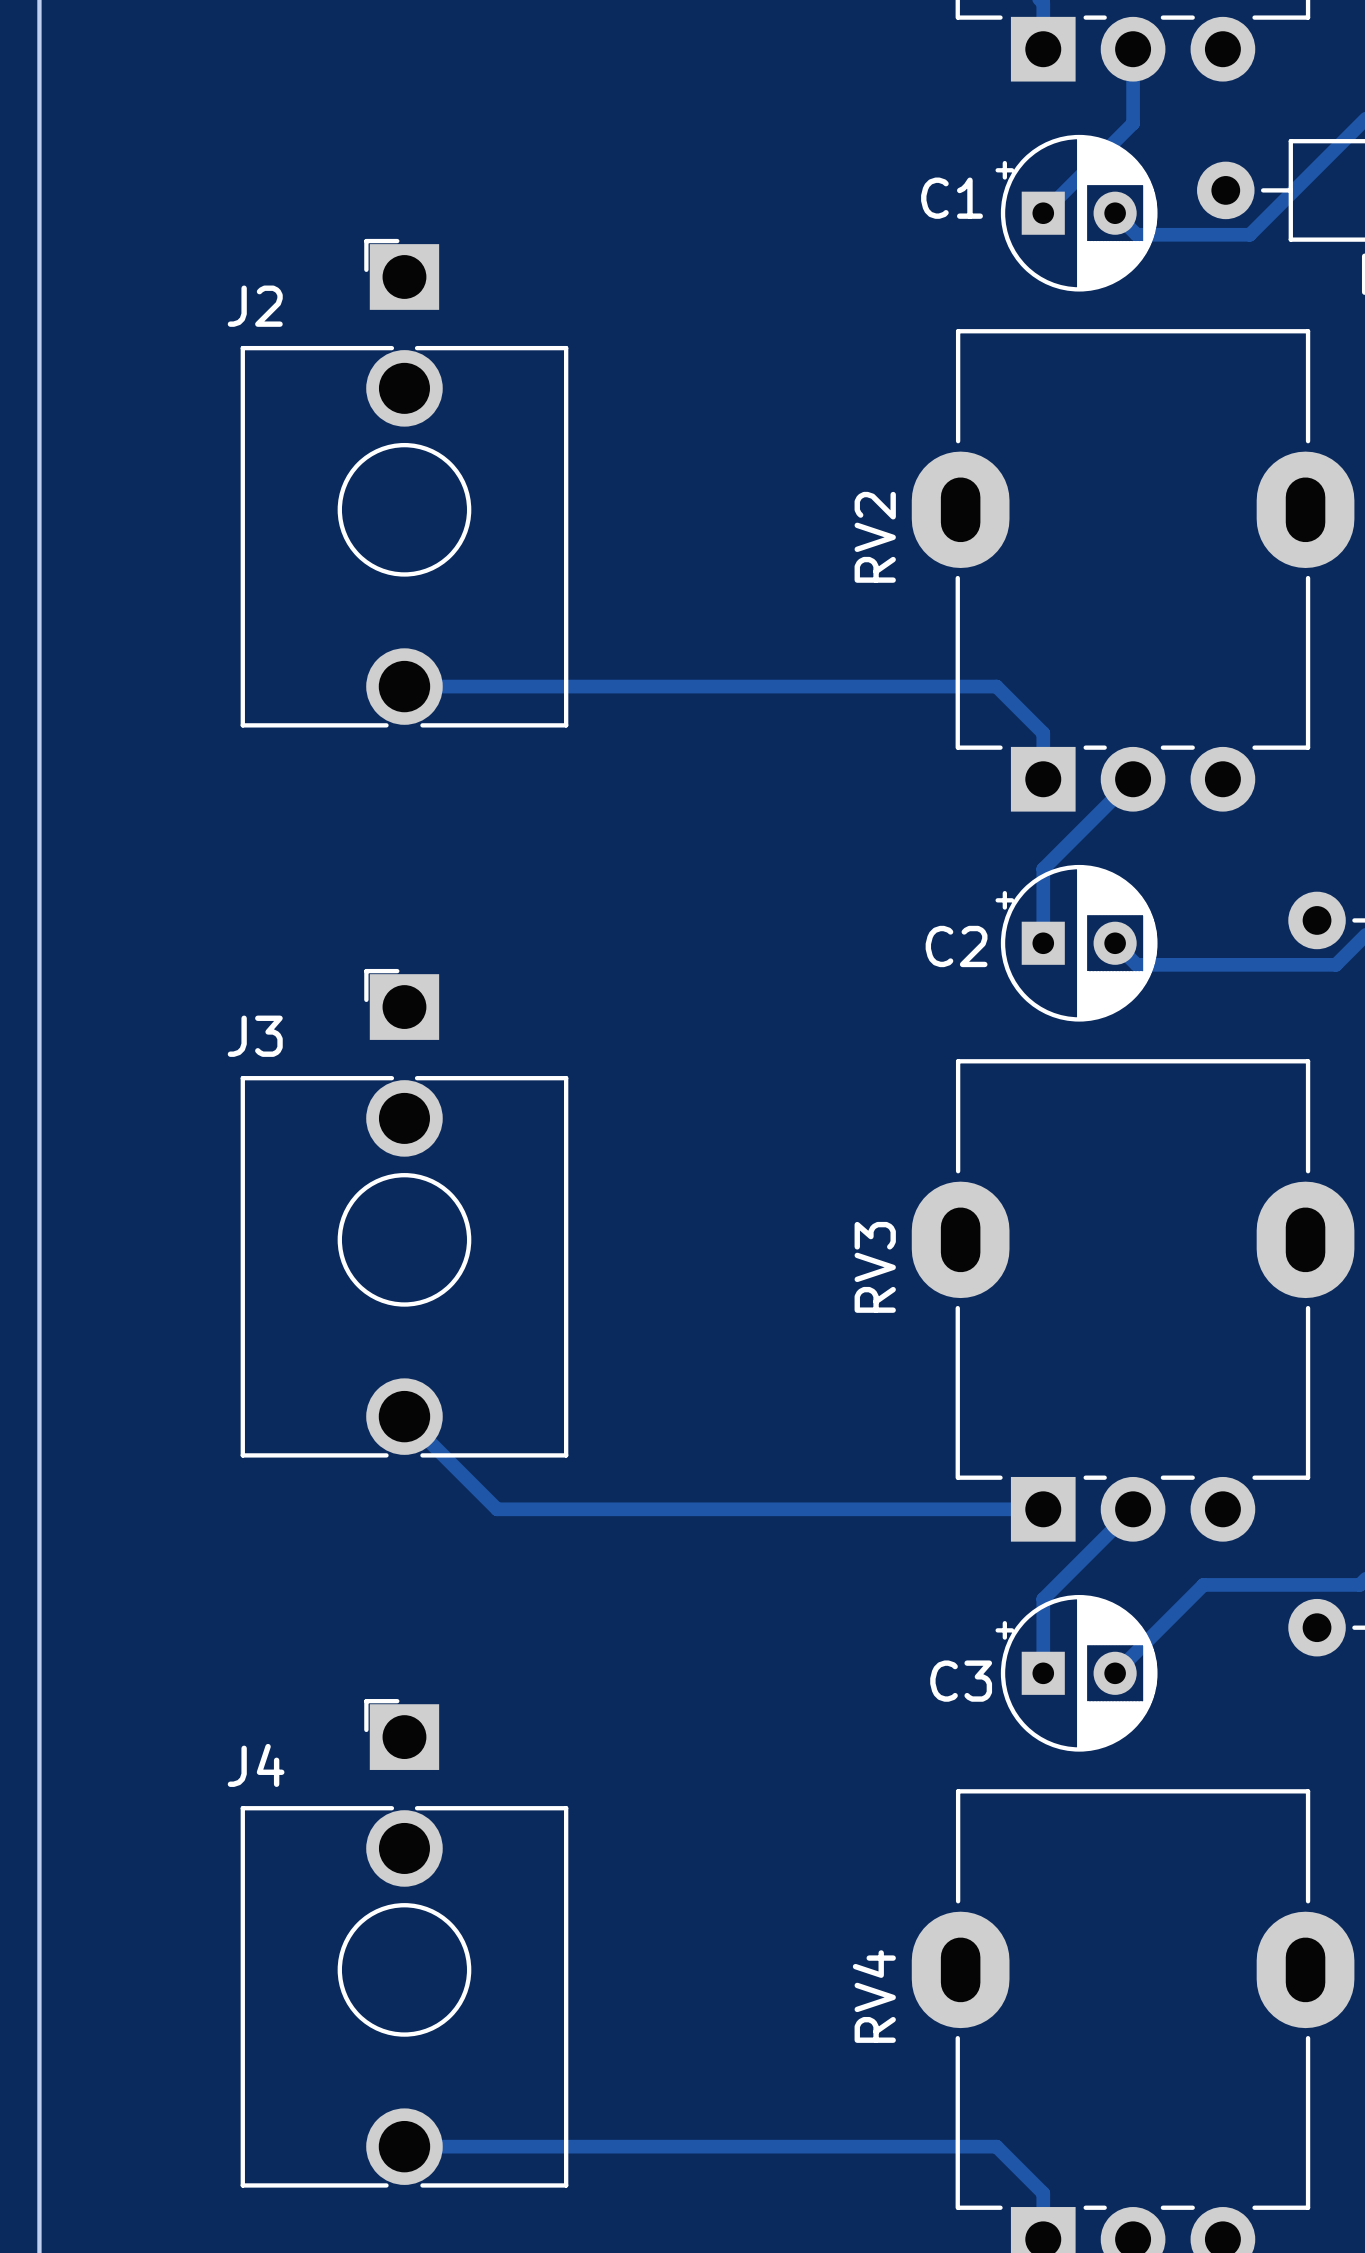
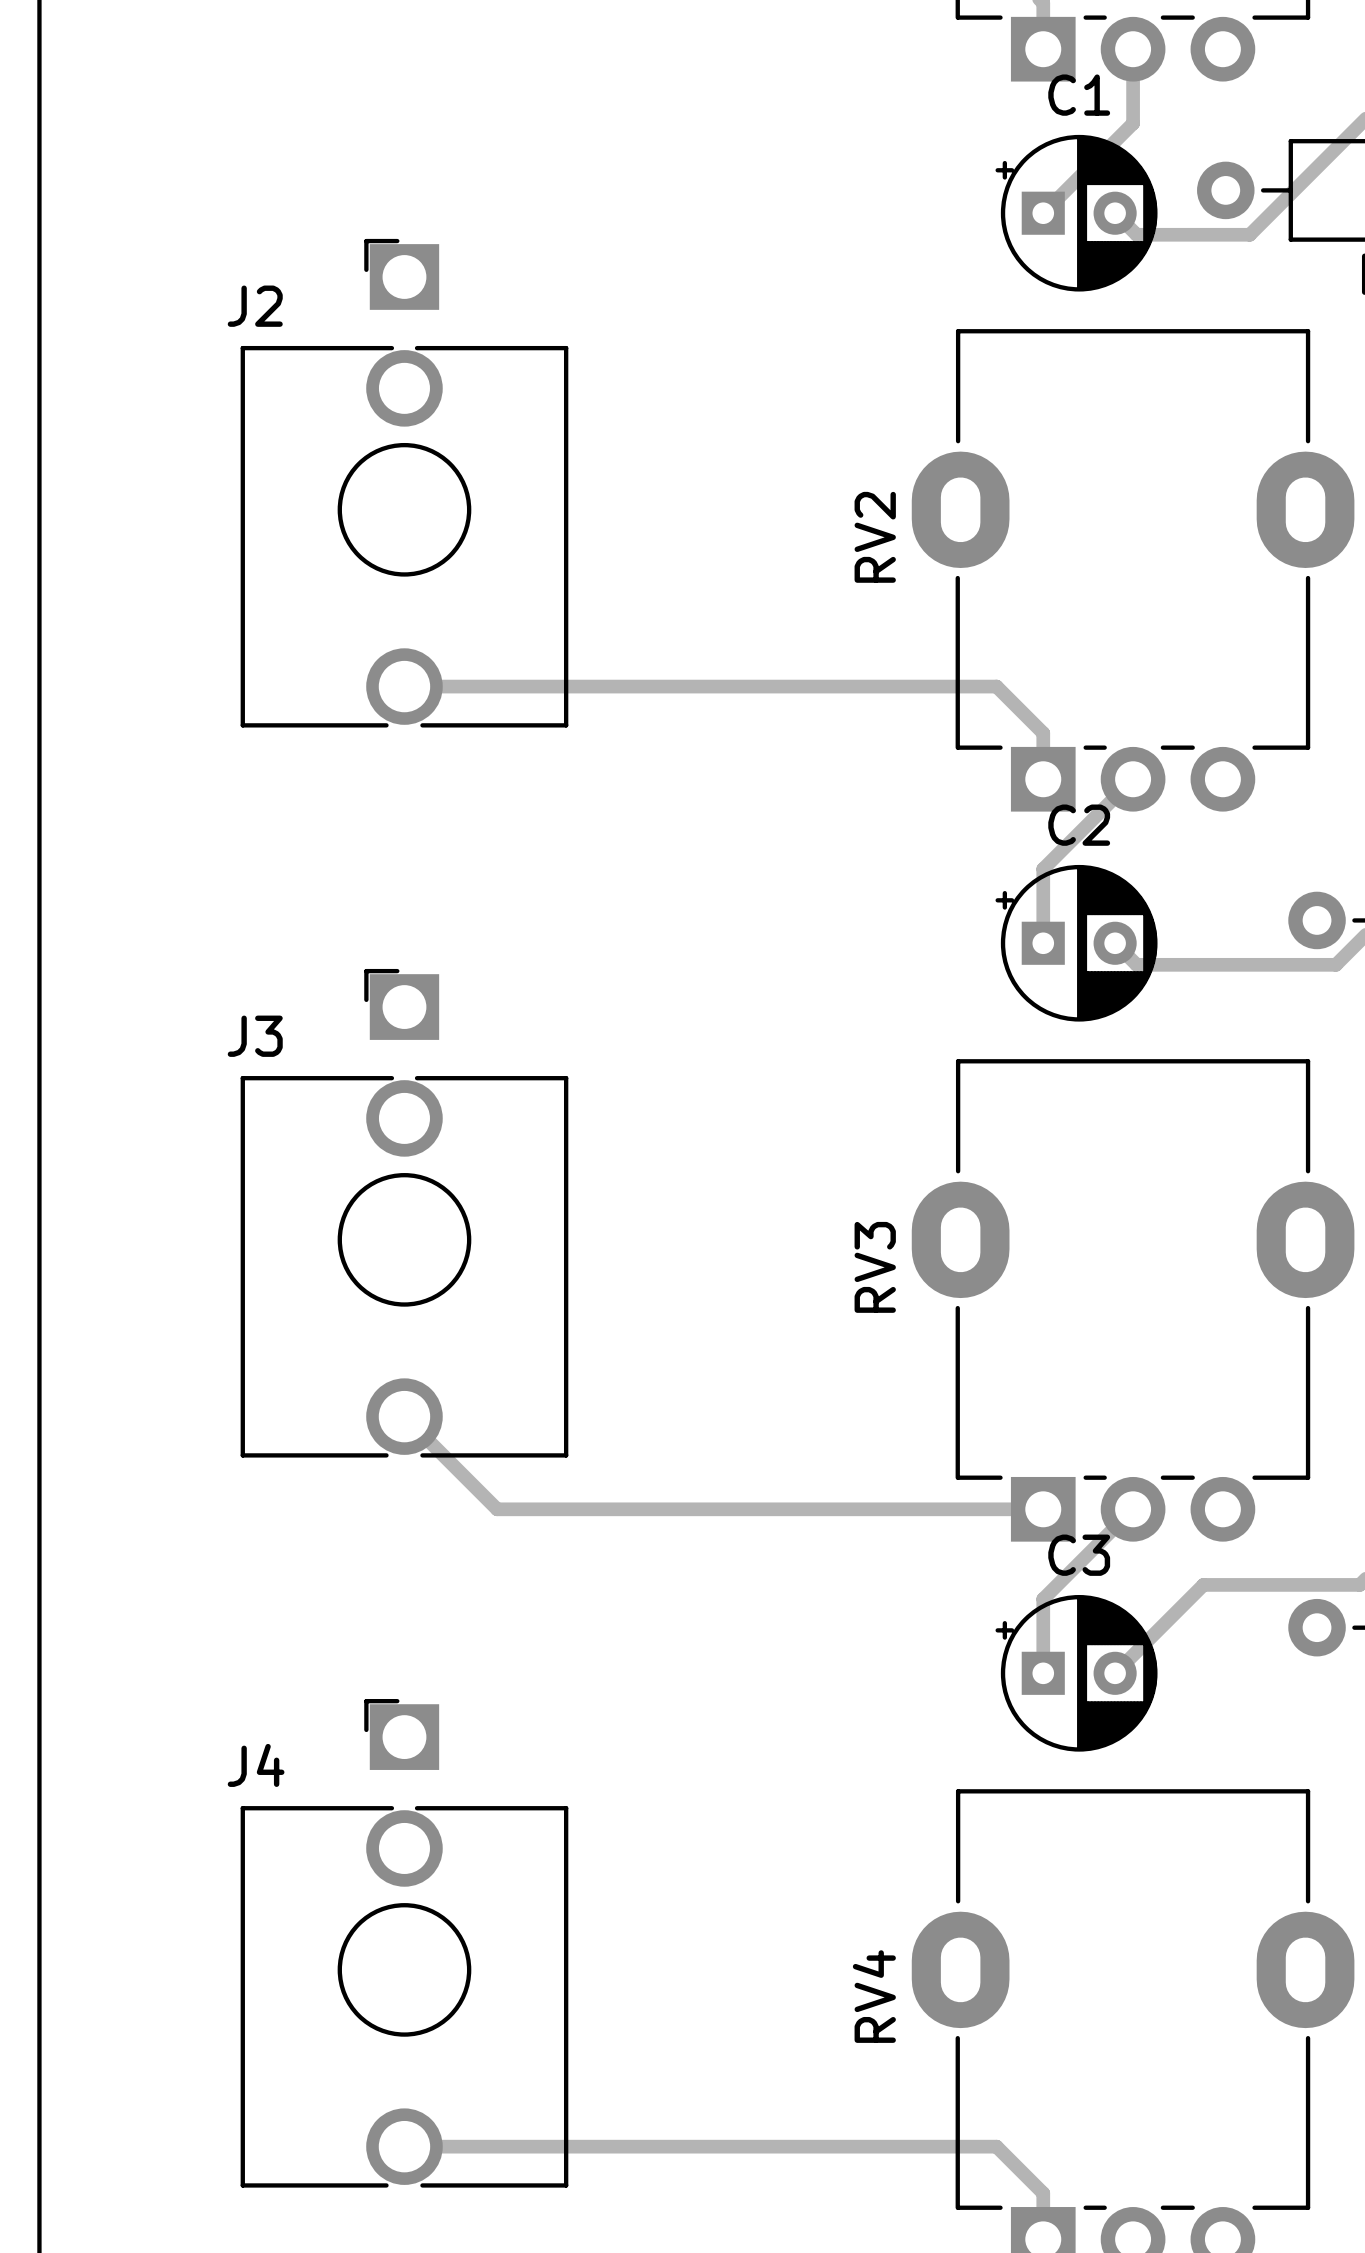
C1 name position: C1 (952, 198) -> C1 (1079, 95)
C2 name position: C2 (956, 946) -> C2 (1079, 825)
C3 name position: C3 (961, 1681) -> C3 (1079, 1555)

